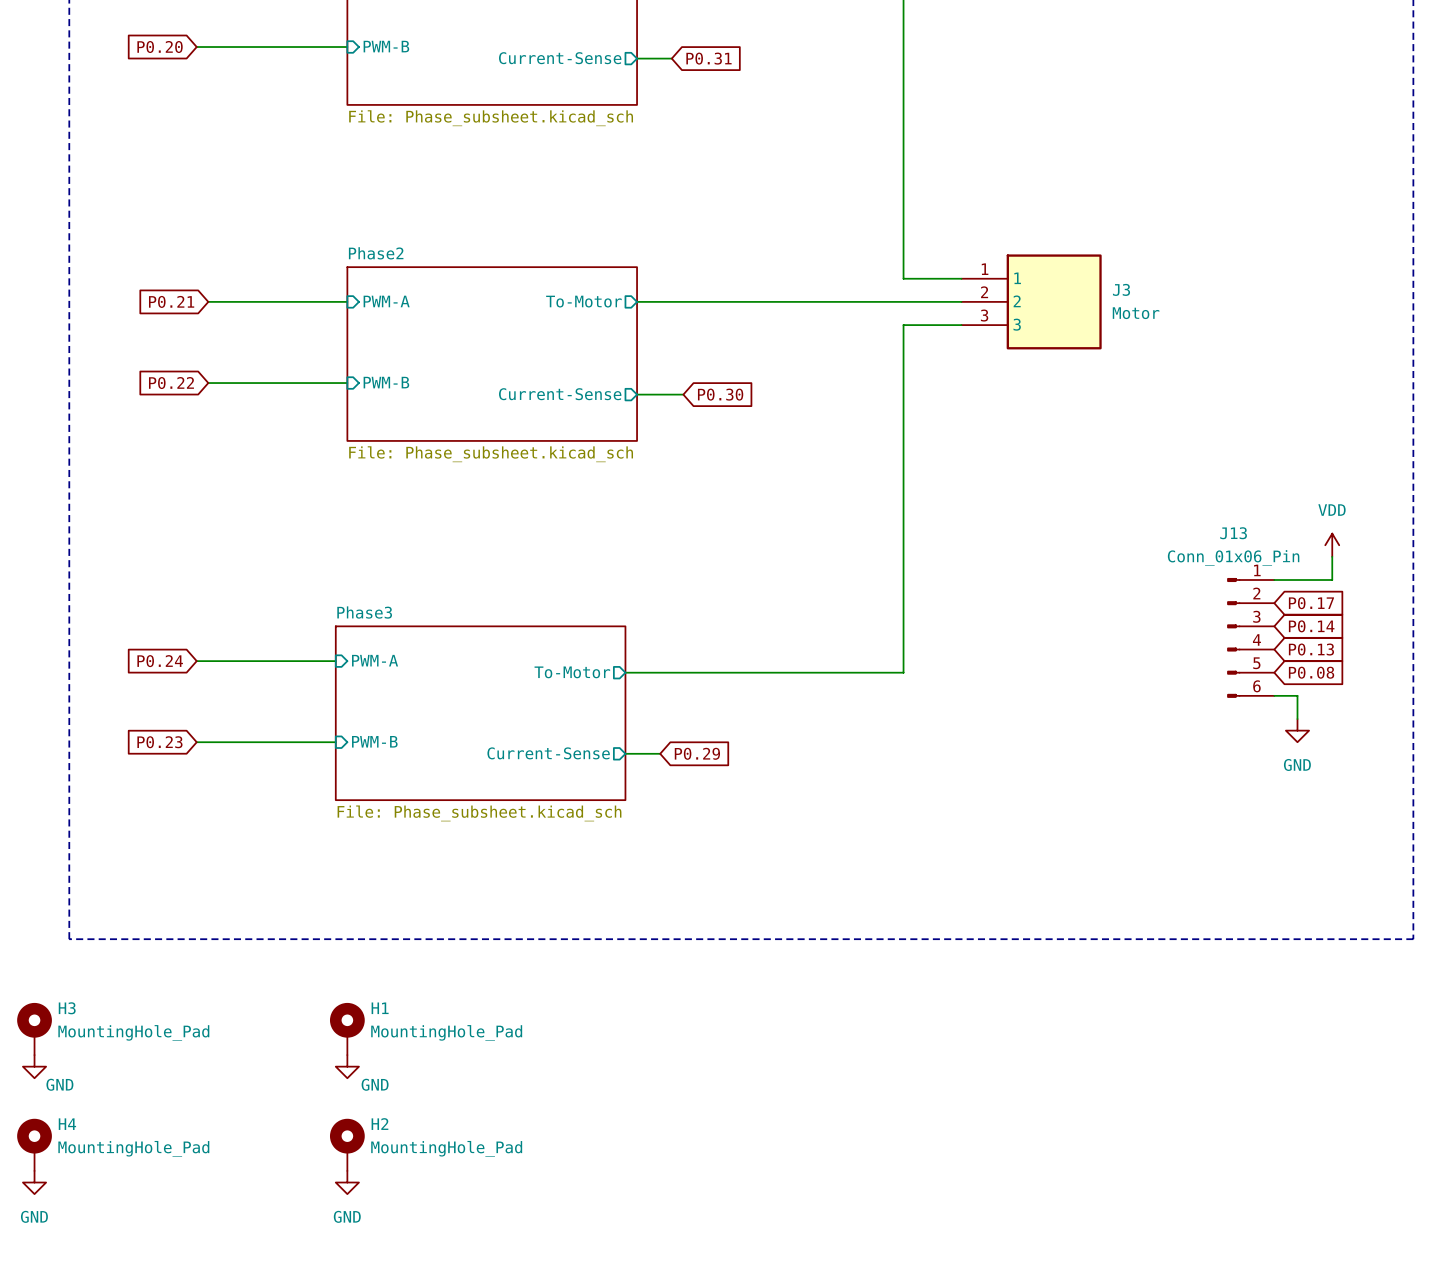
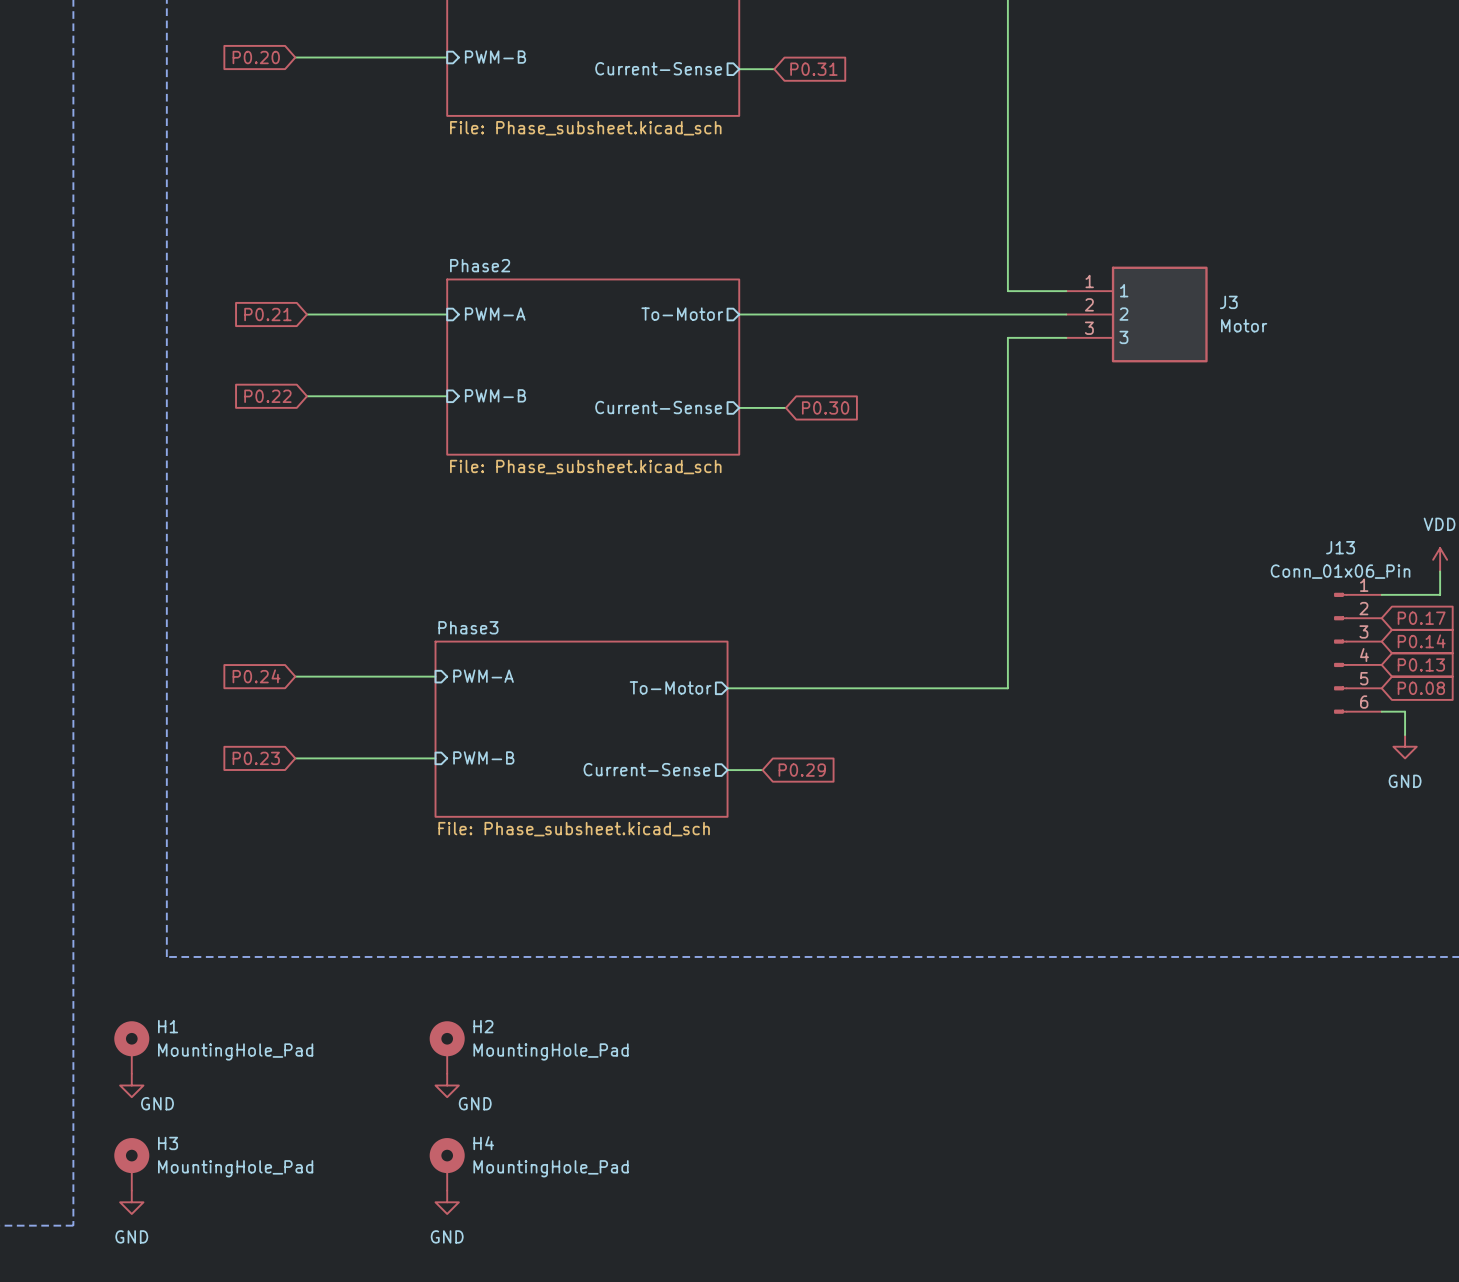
H3 name: H3 (67, 1008) -> H1 (168, 1026)
H1 name: H1 (380, 1008) -> H2 (483, 1026)
H4 name: H4 (67, 1124) -> H3 (168, 1143)
H2 name: H2 (379, 1124) -> H4 (483, 1143)

